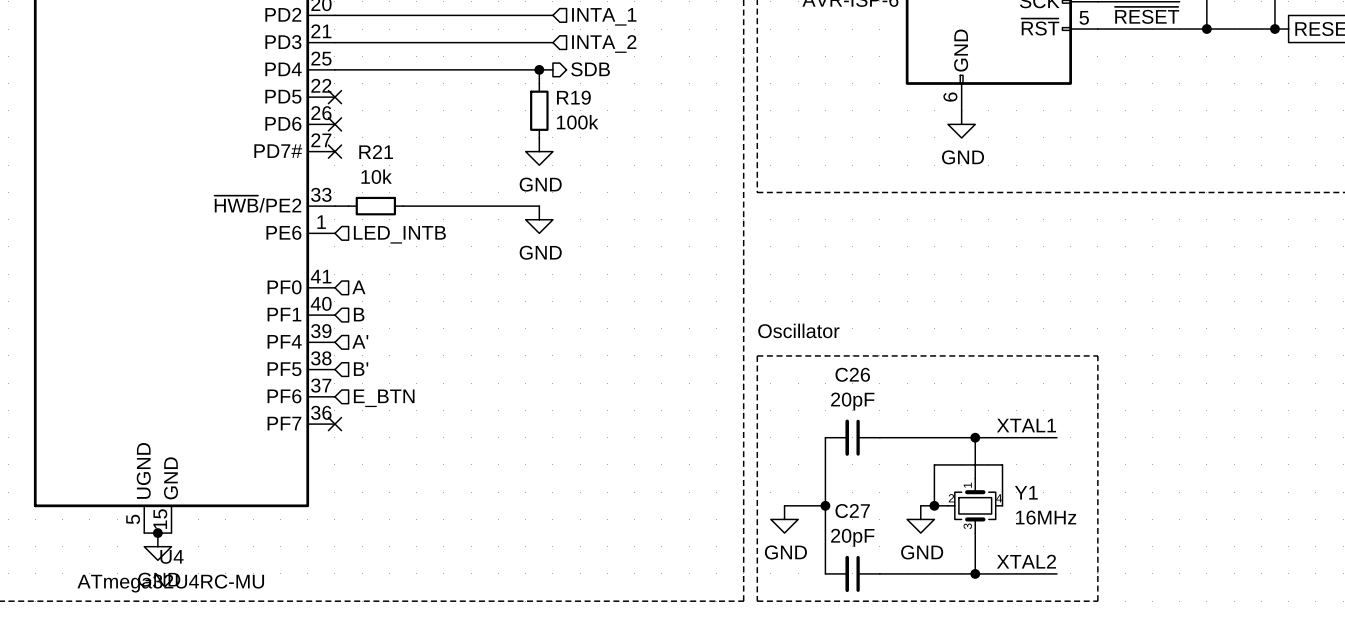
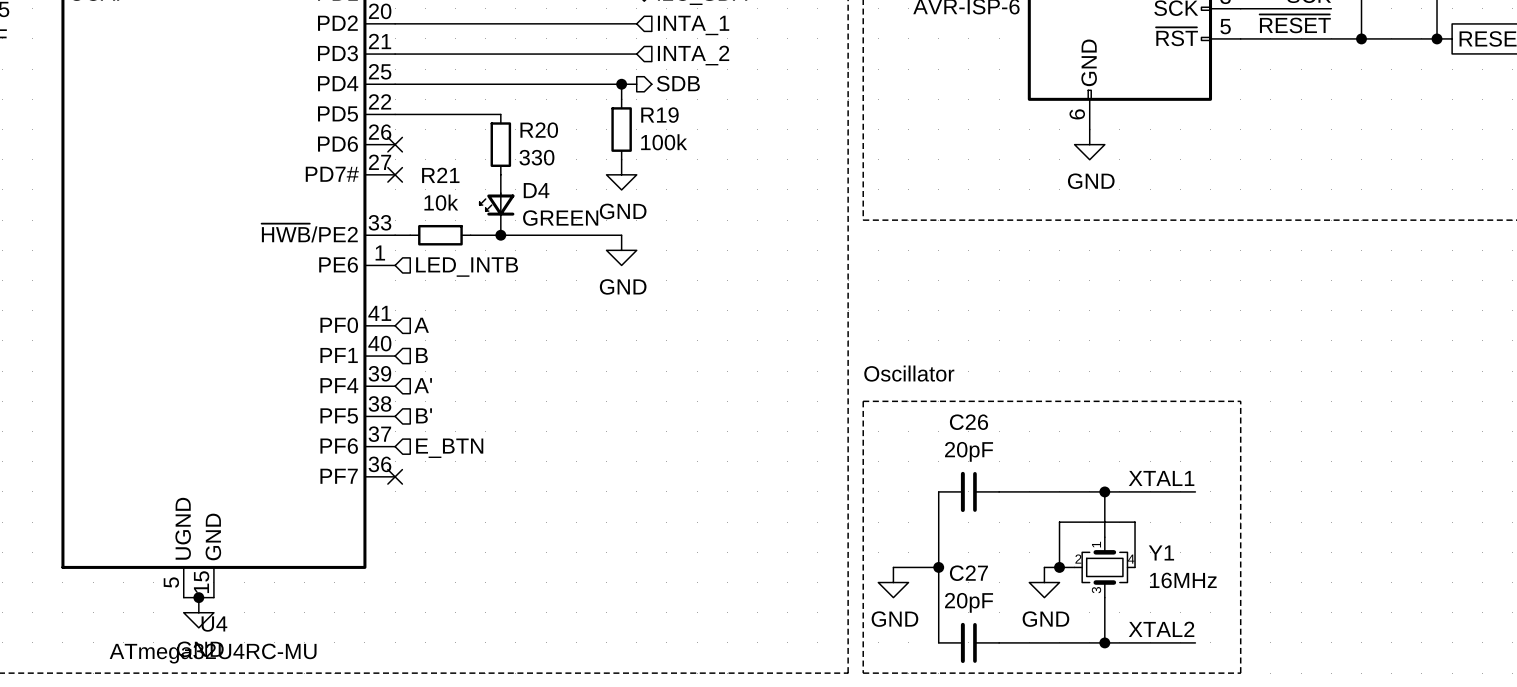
wire: none -> (395, 114) (500, 114)
no-connect mark: (334, 97) -> none
R20: none -> 330 (500, 144)
D4: none -> GREEN (497, 205)
junction: none -> (500, 235)

